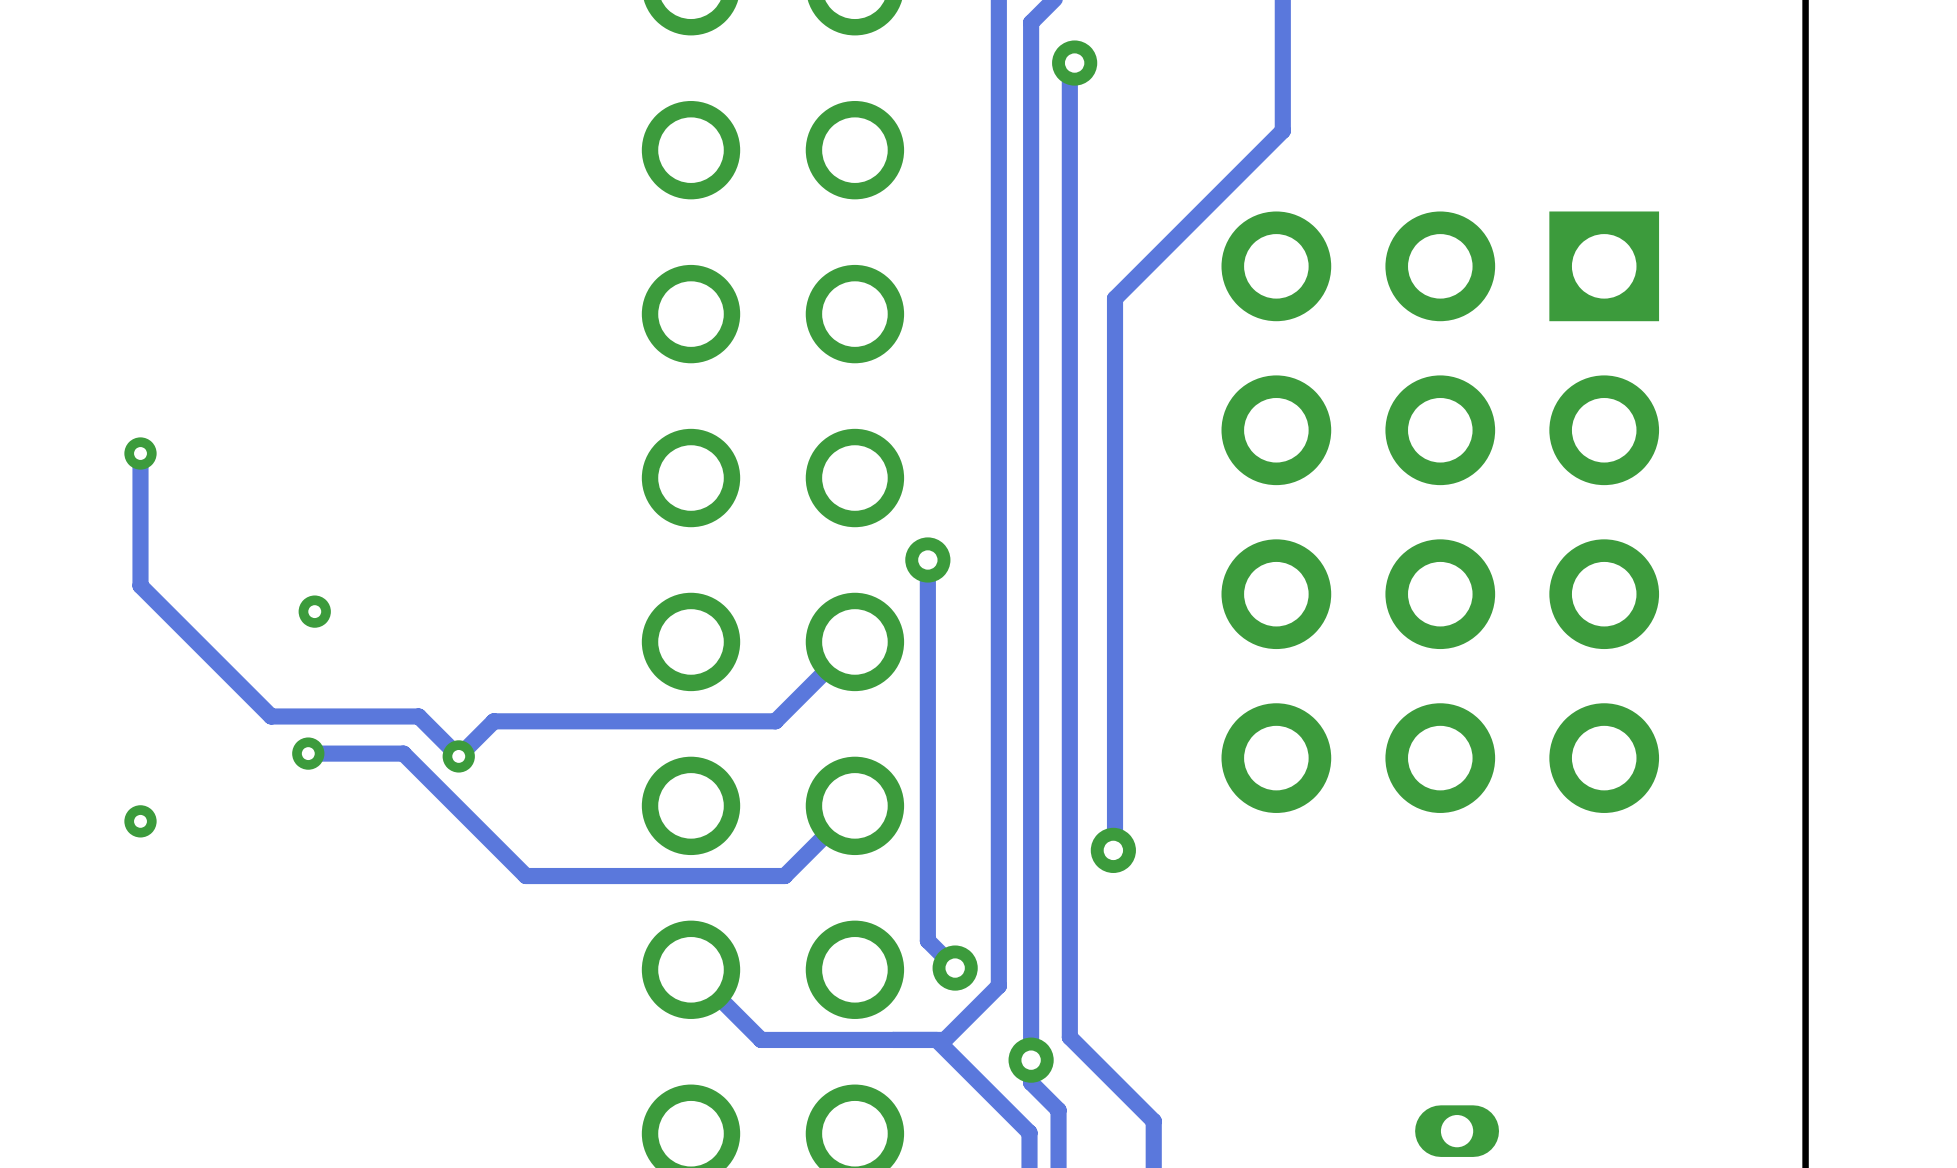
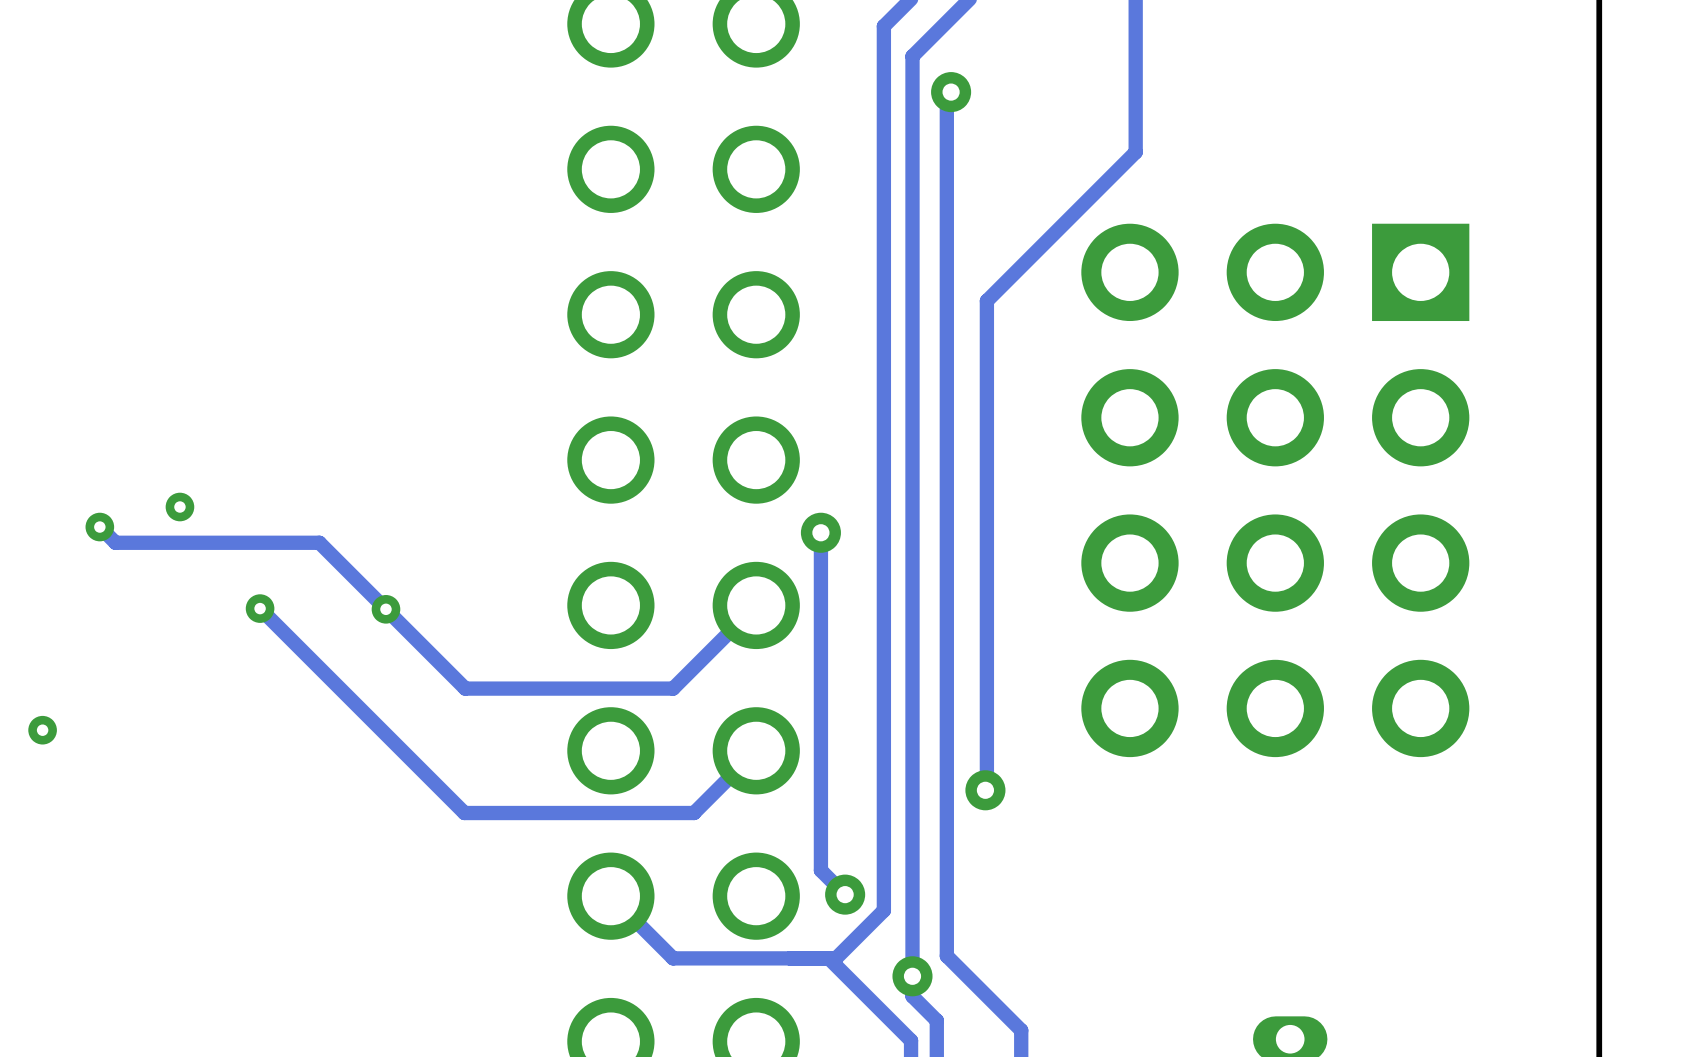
track: (140, 453) (140, 585) (271, 716) (418, 716) (458, 756) (493, 721) (775, 721) -> (99, 527) (115, 542) (319, 542) (465, 688) (673, 688) (685, 675)
via: (140, 453) -> none
via: none -> (179, 507)
via: none -> (99, 527)
via position: (314, 611) -> (260, 608)
via: none -> (385, 609)
via: (308, 753) -> none
track: (403, 753) (308, 753) -> (355, 704) (260, 608)
via: (458, 756) -> none
via position: (140, 821) -> (42, 730)

